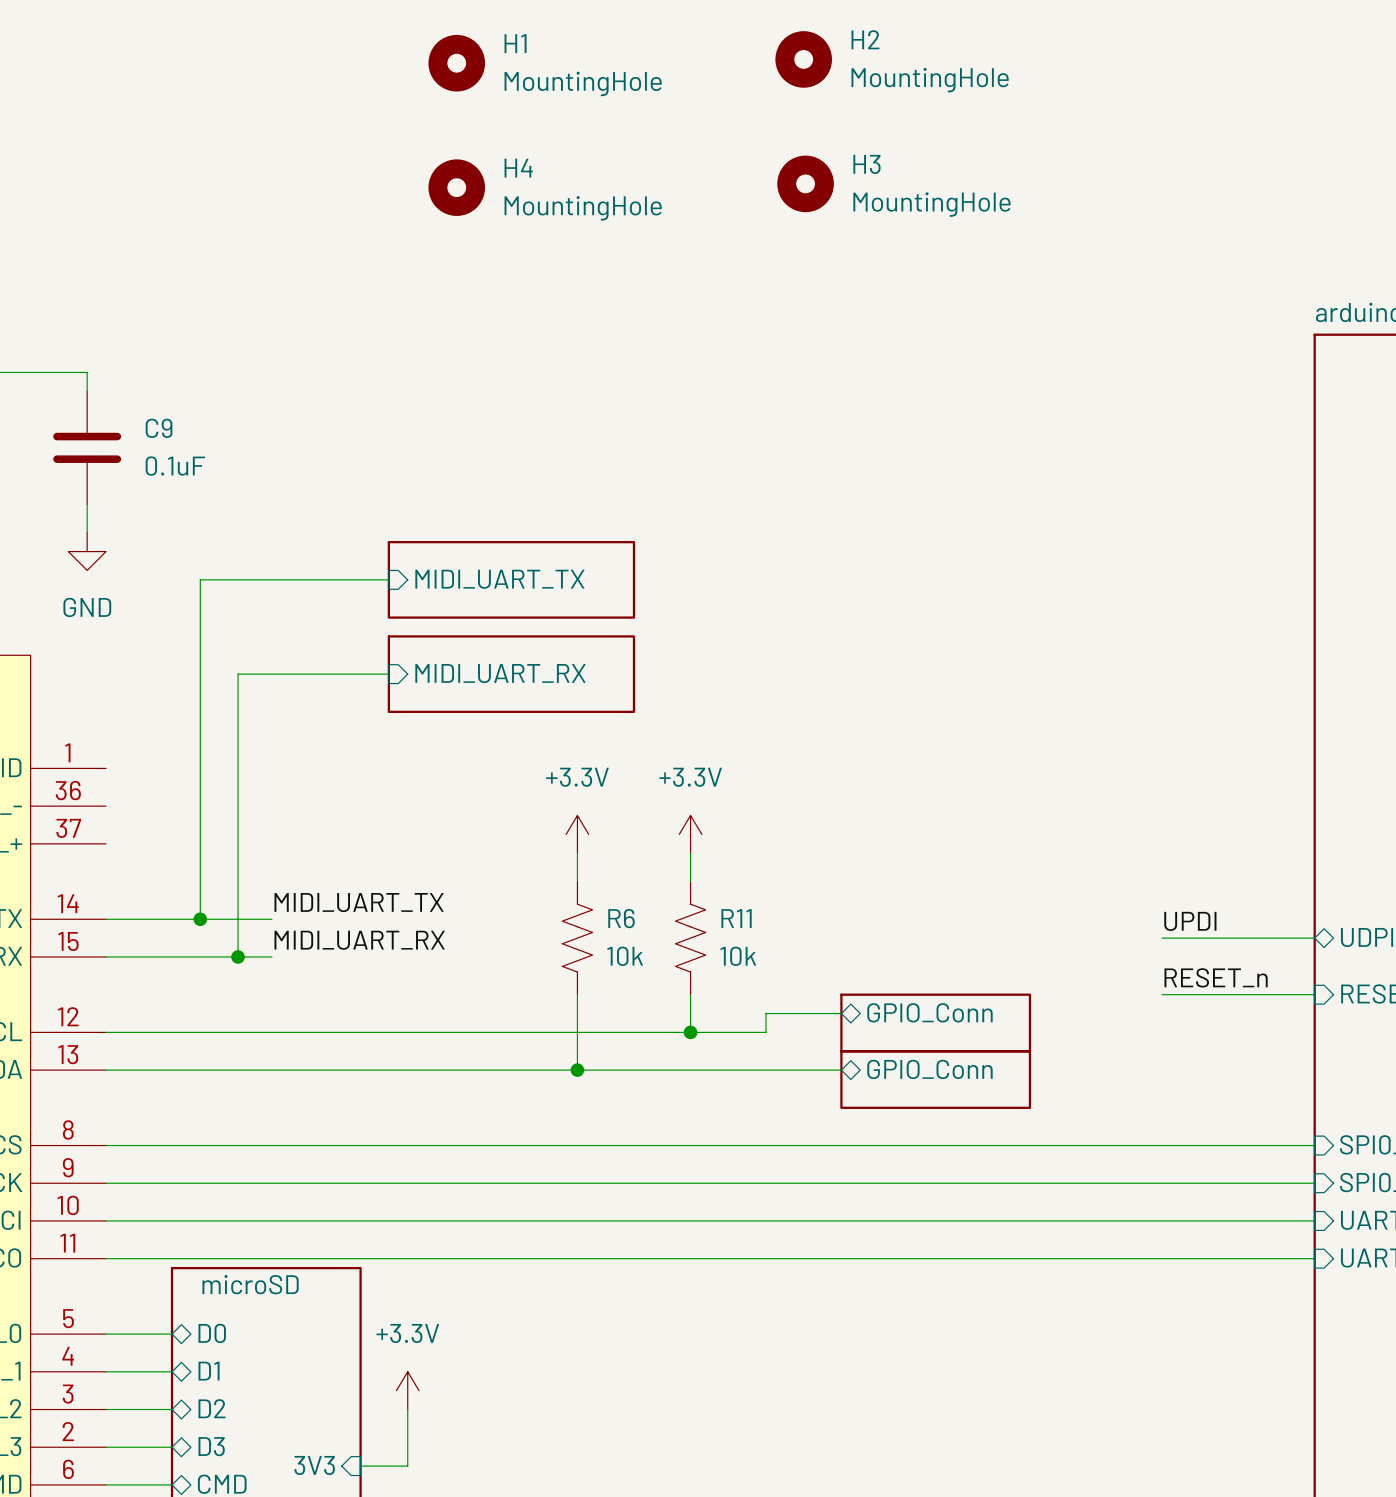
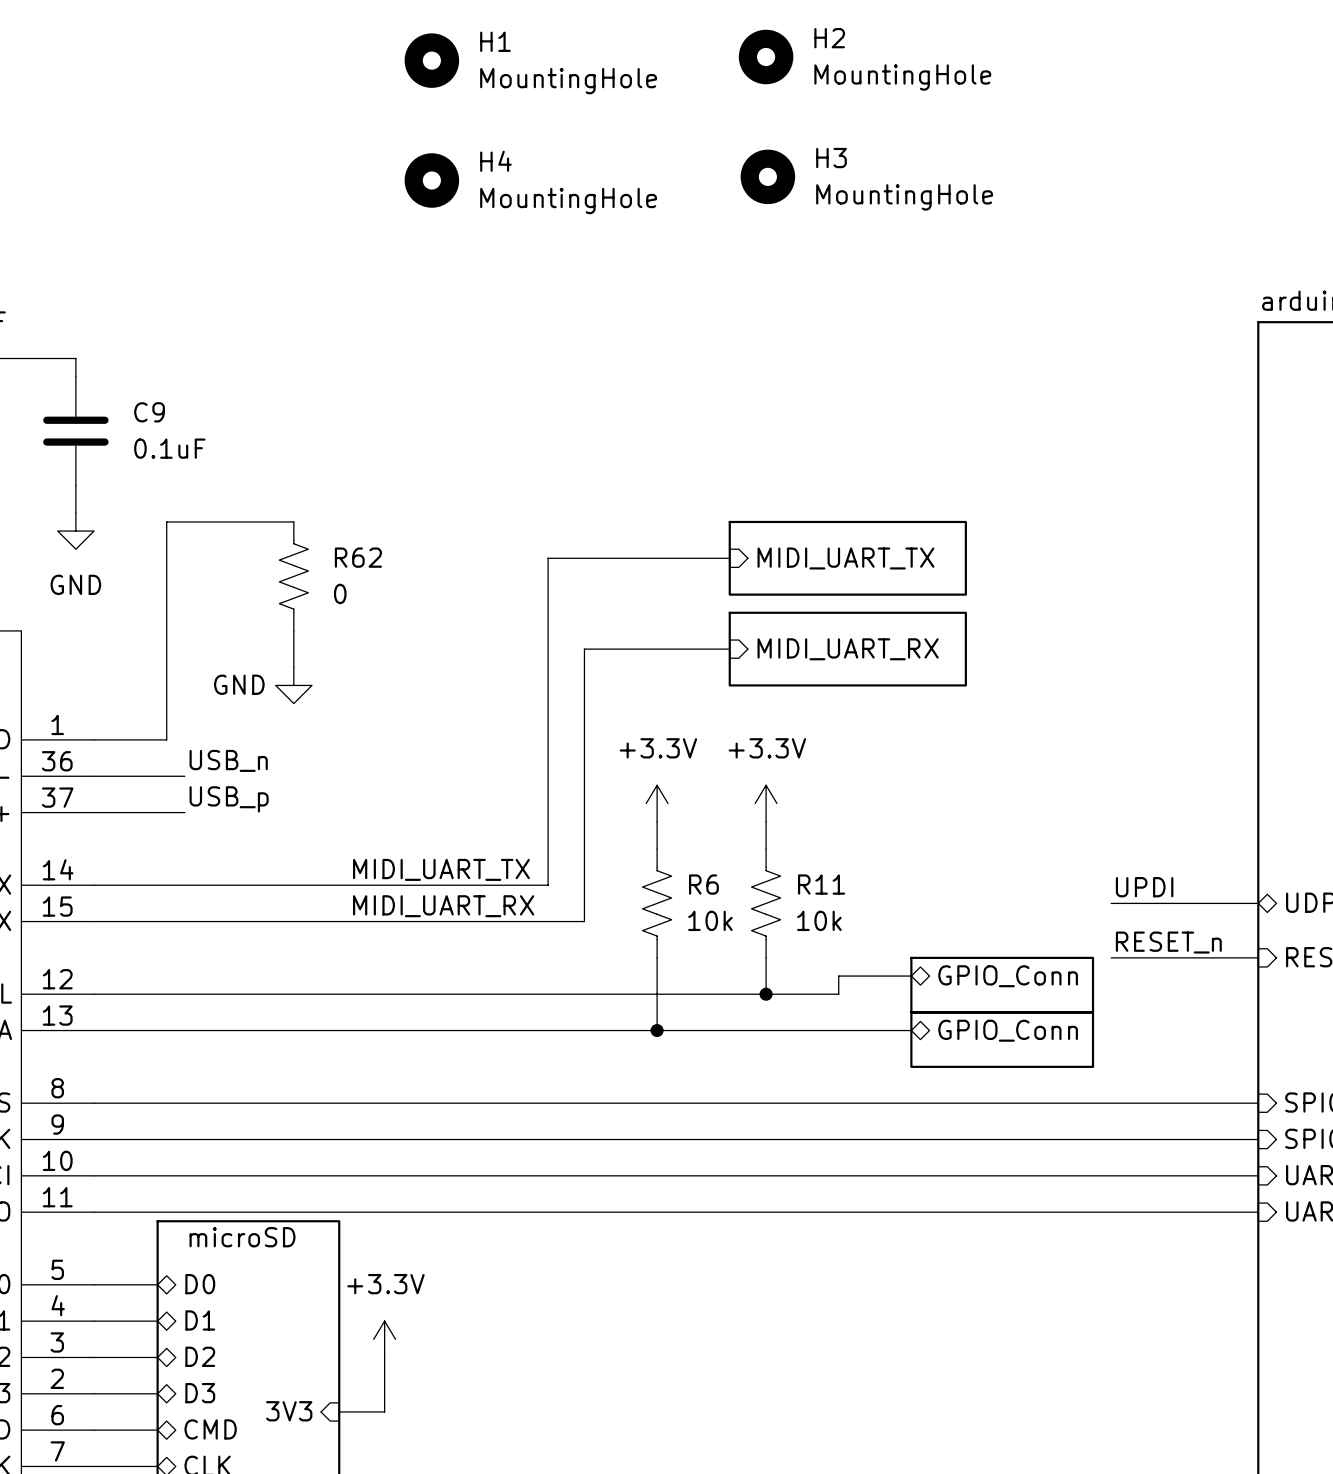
wire: none -> (293, 521) (166, 521) (166, 739) (94, 739)
wire: (388, 579) (200, 579) (200, 919) -> none
sheet pin: MIDI_UART_TX (499, 579) -> none
sheet: (511, 579) -> none
wire: none -> (729, 558) (548, 558) (548, 821)
sheet pin: none -> MIDI_UART_TX (845, 558)
sheet: none -> (847, 558)
R62: none -> 0 (293, 576)
wire: none -> (293, 630) (293, 667)
sheet pin: MIDI_UART_RX (500, 673) -> none
sheet pin: none -> MIDI_UART_RX (848, 649)
wire: (388, 674) (238, 674) (238, 956) -> none
sheet: (511, 674) -> none
wire: none -> (729, 649) (584, 649) (584, 921) (253, 921)
sheet: none -> (847, 649)
power symbol: none -> GND (293, 685)
label: none -> USB_n (228, 760)
wire: none -> (94, 776) (184, 776)
label: none -> USB_p (229, 799)
power symbol position: +3.3V (577, 834) -> +3.3V (766, 803)
wire: none -> (94, 812) (184, 812)
wire: none -> (766, 821) (766, 848)
wire: none -> (548, 848) (548, 885) (253, 885)
label position: MIDI_UART_TX (359, 902) -> MIDI_UART_TX (441, 869)
R11 name: R11 (736, 918) -> R6 (703, 884)
junction: (200, 919) -> none
R6: 10k (577, 938) -> none
R11: none -> 10k (766, 903)
label position: MIDI_UART_RX (359, 940) -> MIDI_UART_RX (443, 906)
junction: (238, 956) -> none
wire: (577, 994) (577, 1070) -> none
wire: none -> (766, 957) (766, 994)
sheet pin position: GPIO_Conn (929, 1012) -> GPIO_Conn (1008, 976)
wire: (841, 1013) (765, 1013) (765, 1032) -> (911, 976) (838, 976) (838, 994) (729, 994)
sheet: (935, 1022) -> none
sheet: none -> (1002, 985)
wire: none -> (657, 994) (657, 1030)
junction position: (690, 1032) -> (657, 1030)
junction: none -> (766, 994)
sheet pin position: GPIO_Conn (929, 1069) -> GPIO_Conn (1008, 1030)
junction: (577, 1070) -> none
wire: none -> (802, 1030) (911, 1030)
sheet: (935, 1079) -> none
sheet: none -> (1002, 1039)

